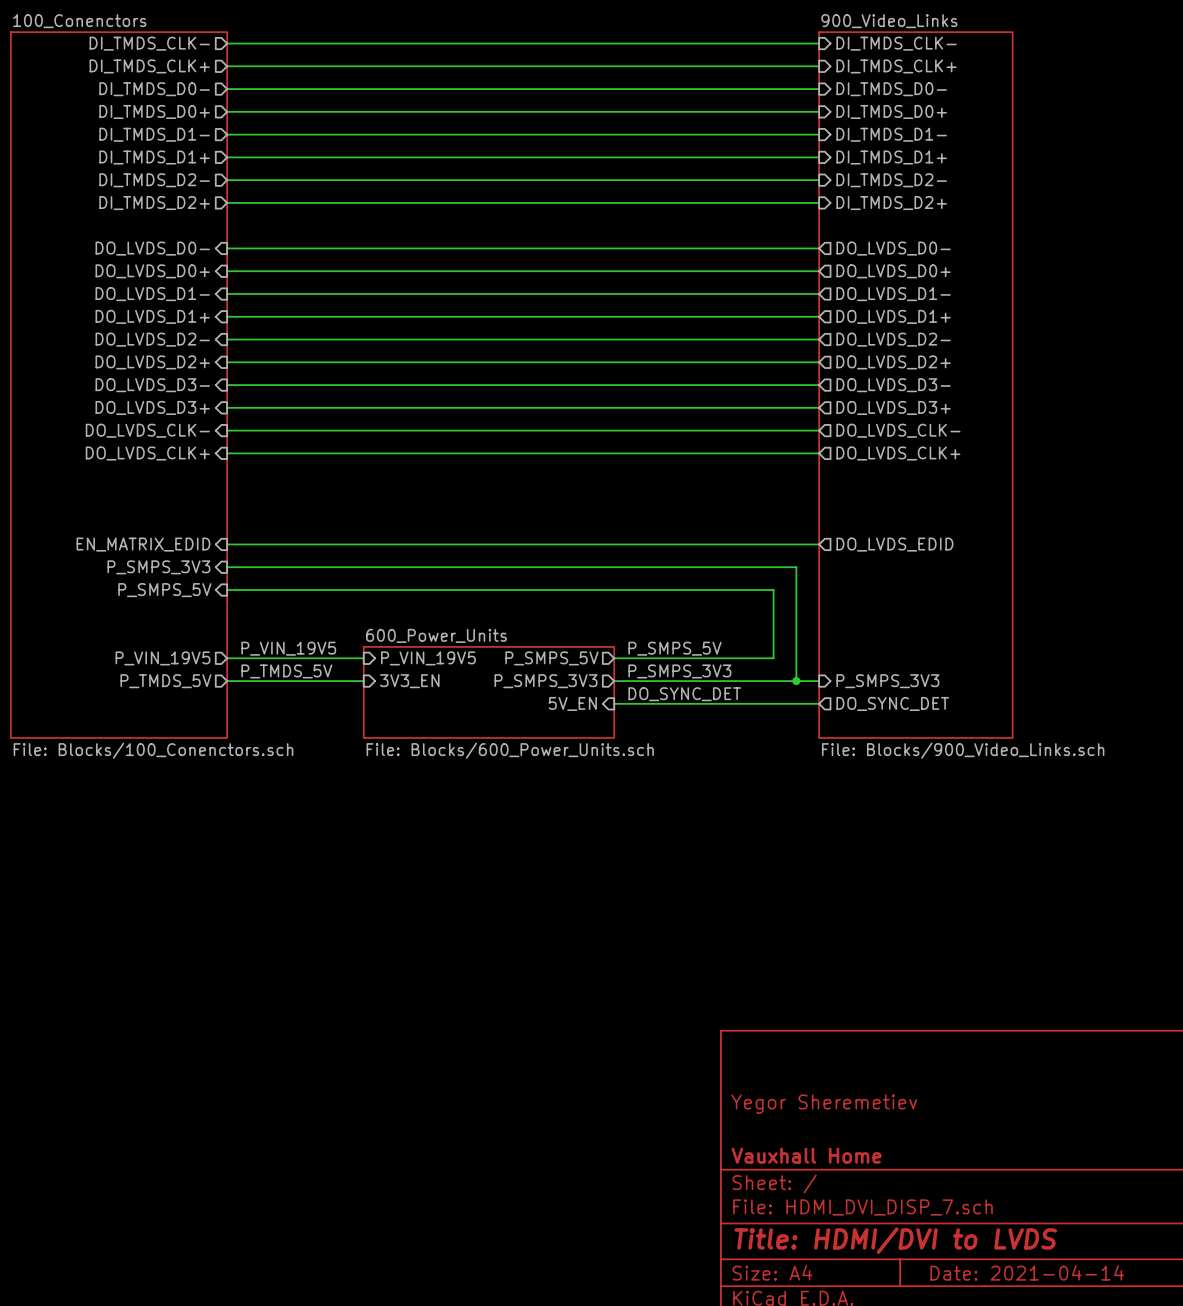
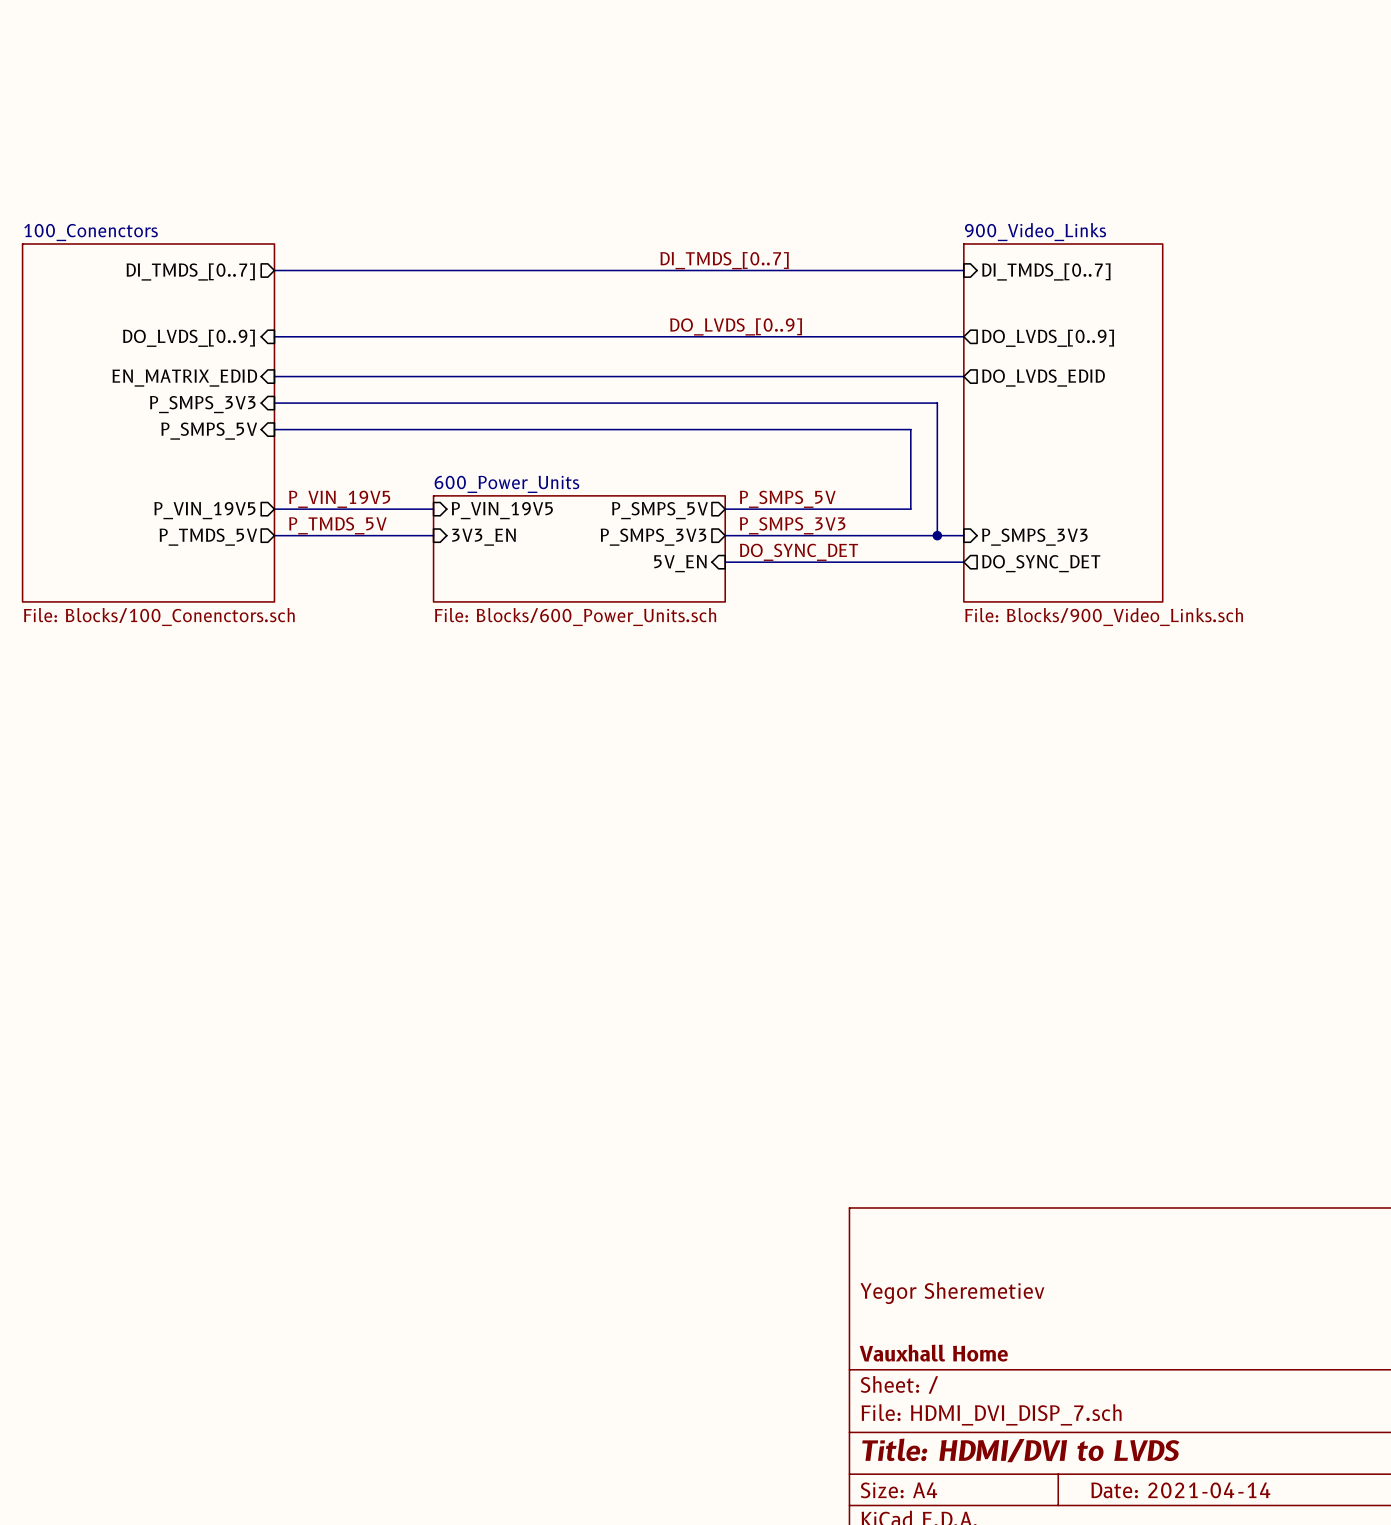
sheet 100_Conenctors name position: 100_Conenctors (79, 21) -> 100_Conenctors (91, 232)
sheet 900_Video_Links name position: 900_Video_Links (889, 21) -> 900_Video_Links (1035, 232)
sheet 100_Conenctors shape: [10, 32, 228, 738] -> [22, 243, 275, 602]
sheet 900_Video_Links shape: [819, 32, 1013, 738] -> [963, 243, 1163, 602]
sheet pin: DI_TMDS_CLK- (149, 43) -> none
wire: (227, 43) (819, 43) -> none
sheet pin: DI_TMDS_CLK- (896, 43) -> none
sheet pin: DI_TMDS_CLK+ (149, 66) -> none
wire: (227, 66) (819, 66) -> none
sheet pin: DI_TMDS_CLK+ (896, 66) -> none
sheet pin: DI_TMDS_D0- (154, 89) -> none
wire: (227, 89) (819, 89) -> none
sheet pin: DI_TMDS_D0- (891, 89) -> none
sheet pin: DI_TMDS_D0+ (154, 111) -> none
wire: (227, 111) (819, 111) -> none
sheet pin: DI_TMDS_D0+ (891, 111) -> none
sheet pin: DI_TMDS_D1- (154, 134) -> none
wire: (227, 134) (819, 134) -> none
sheet pin: DI_TMDS_D1- (891, 134) -> none
sheet pin: DI_TMDS_D1+ (154, 157) -> none
wire: (227, 157) (819, 157) -> none
sheet pin: DI_TMDS_D1+ (891, 157) -> none
sheet pin: DI_TMDS_D2- (154, 180) -> none
wire: (227, 180) (819, 180) -> none
sheet pin: DI_TMDS_D2- (891, 180) -> none
wire: (227, 202) (819, 202) -> none
sheet pin: DI_TMDS_D2+ (154, 203) -> DI_TMDS_[0..7] (190, 272)
sheet pin: DI_TMDS_D2+ (891, 203) -> DI_TMDS_[0..7] (1046, 272)
label: none -> DI_TMDS_[0..7] (724, 260)
bus: none -> (274, 270) (963, 270)
sheet pin: DO_LVDS_D0- (152, 248) -> none
wire: (227, 248) (819, 248) -> none
sheet pin: DO_LVDS_D0- (893, 248) -> none
sheet pin: DO_LVDS_D0+ (152, 271) -> none
wire: (227, 271) (819, 271) -> none
sheet pin: DO_LVDS_D0+ (893, 271) -> none
label: none -> DO_LVDS_[0..9] (736, 326)
bus: none -> (274, 336) (963, 336)
sheet pin: none -> DO_LVDS_[0..9] (189, 338)
sheet pin: none -> DO_LVDS_[0..9] (1048, 338)
sheet pin: DO_LVDS_D1- (152, 294) -> none
wire: (227, 294) (819, 294) -> none
sheet pin: DO_LVDS_D1- (893, 294) -> none
sheet pin: DO_LVDS_D1+ (152, 316) -> EN_MATRIX_EDID (184, 378)
sheet pin: DO_LVDS_D1+ (893, 316) -> DO_LVDS_EDID (1043, 378)
sheet pin: DO_LVDS_D2- (152, 339) -> P_SMPS_3V3 (202, 404)
wire: (796, 339) (819, 339) -> (937, 403) (937, 535)
sheet pin: DO_LVDS_D2- (893, 339) -> none
sheet pin: DO_LVDS_D2+ (152, 362) -> P_SMPS_5V (209, 431)
wire: (773, 362) (819, 362) -> (910, 429) (910, 509)
sheet pin: DO_LVDS_D2+ (893, 362) -> none
sheet pin: DO_LVDS_D3- (152, 385) -> none
wire: (227, 385) (819, 385) -> none
sheet pin: DO_LVDS_D3- (893, 385) -> none
sheet pin: DO_LVDS_D3+ (152, 407) -> none
wire: (227, 407) (819, 407) -> none
sheet pin: DO_LVDS_D3+ (893, 407) -> none
label: none -> P_VIN_19V5 (339, 499)
label: none -> P_SMPS_5V (787, 499)
sheet pin shape: input (147, 430) -> output (204, 510)
sheet pin: DO_LVDS_CLK- (147, 430) -> P_VIN_19V5 (204, 510)
wire: (363, 430) (614, 430) -> none
sheet pin: none -> P_VIN_19V5 (502, 510)
sheet pin: none -> P_SMPS_5V (659, 510)
wire: (773, 430) (819, 430) -> none
sheet pin: DO_LVDS_CLK- (898, 430) -> none
label: none -> P_TMDS_5V (337, 525)
label: none -> P_SMPS_3V3 (792, 525)
sheet pin shape: input (147, 453) -> output (208, 537)
sheet pin: DO_LVDS_CLK+ (147, 453) -> P_TMDS_5V (208, 537)
wire: (363, 453) (614, 453) -> none
sheet pin: none -> 3V3_EN (483, 537)
sheet pin: none -> P_SMPS_3V3 (653, 537)
junction: none -> (937, 535)
sheet pin shape: output (898, 453) -> input (1034, 537)
sheet pin: DO_LVDS_CLK+ (898, 453) -> P_SMPS_3V3 (1034, 537)
label: none -> DO_SYNC_DET (799, 552)
sheet pin: none -> 5V_EN (680, 563)
sheet pin: none -> DO_SYNC_DET (1041, 563)
sheet pin: EN_MATRIX_EDID (143, 544) -> none
wire: (227, 544) (819, 544) -> none
sheet pin: DO_LVDS_EDID (894, 544) -> none
sheet pin: P_SMPS_3V3 (158, 567) -> none
wire: (227, 567) (796, 567) (796, 681) -> none
sheet pin: P_SMPS_5V (164, 590) -> none
wire: (227, 590) (773, 590) (773, 658) (614, 658) -> none
label: P_VIN_19V5 (288, 648) -> none
label: P_SMPS_5V (675, 648) -> none
sheet pin: P_VIN_19V5 (162, 658) -> none
wire: (227, 658) (363, 658) -> none
sheet pin: P_VIN_19V5 (428, 658) -> none
sheet pin: P_SMPS_5V (551, 658) -> none
label: P_TMDS_5V (286, 671) -> none
label: P_SMPS_3V3 (679, 671) -> none
sheet pin: P_TMDS_5V (165, 681) -> none
wire: (227, 681) (363, 681) -> none
sheet pin: 3V3_EN (409, 681) -> none
sheet pin: P_SMPS_3V3 (546, 681) -> none
wire: (614, 681) (819, 681) -> (725, 562) (963, 562)
junction: (796, 681) -> none
sheet pin: P_SMPS_3V3 (887, 681) -> none
sheet 600_Power_Units position: (488, 692) -> (579, 548)
label: DO_SYNC_DET (684, 694) -> none
sheet pin: 5V_EN (572, 703) -> none
wire: (614, 703) (819, 703) -> none
sheet pin: DO_SYNC_DET (892, 703) -> none
sheet 100_Conenctors value position: File: Blocks/100_Conenctors.sch (153, 750) -> File: Blocks/100_Conenctors.sch (159, 617)
sheet 900_Video_Links value position: File: Blocks/900_Video_Links.sch (963, 750) -> File: Blocks/900_Video_Links.sch (1104, 617)

